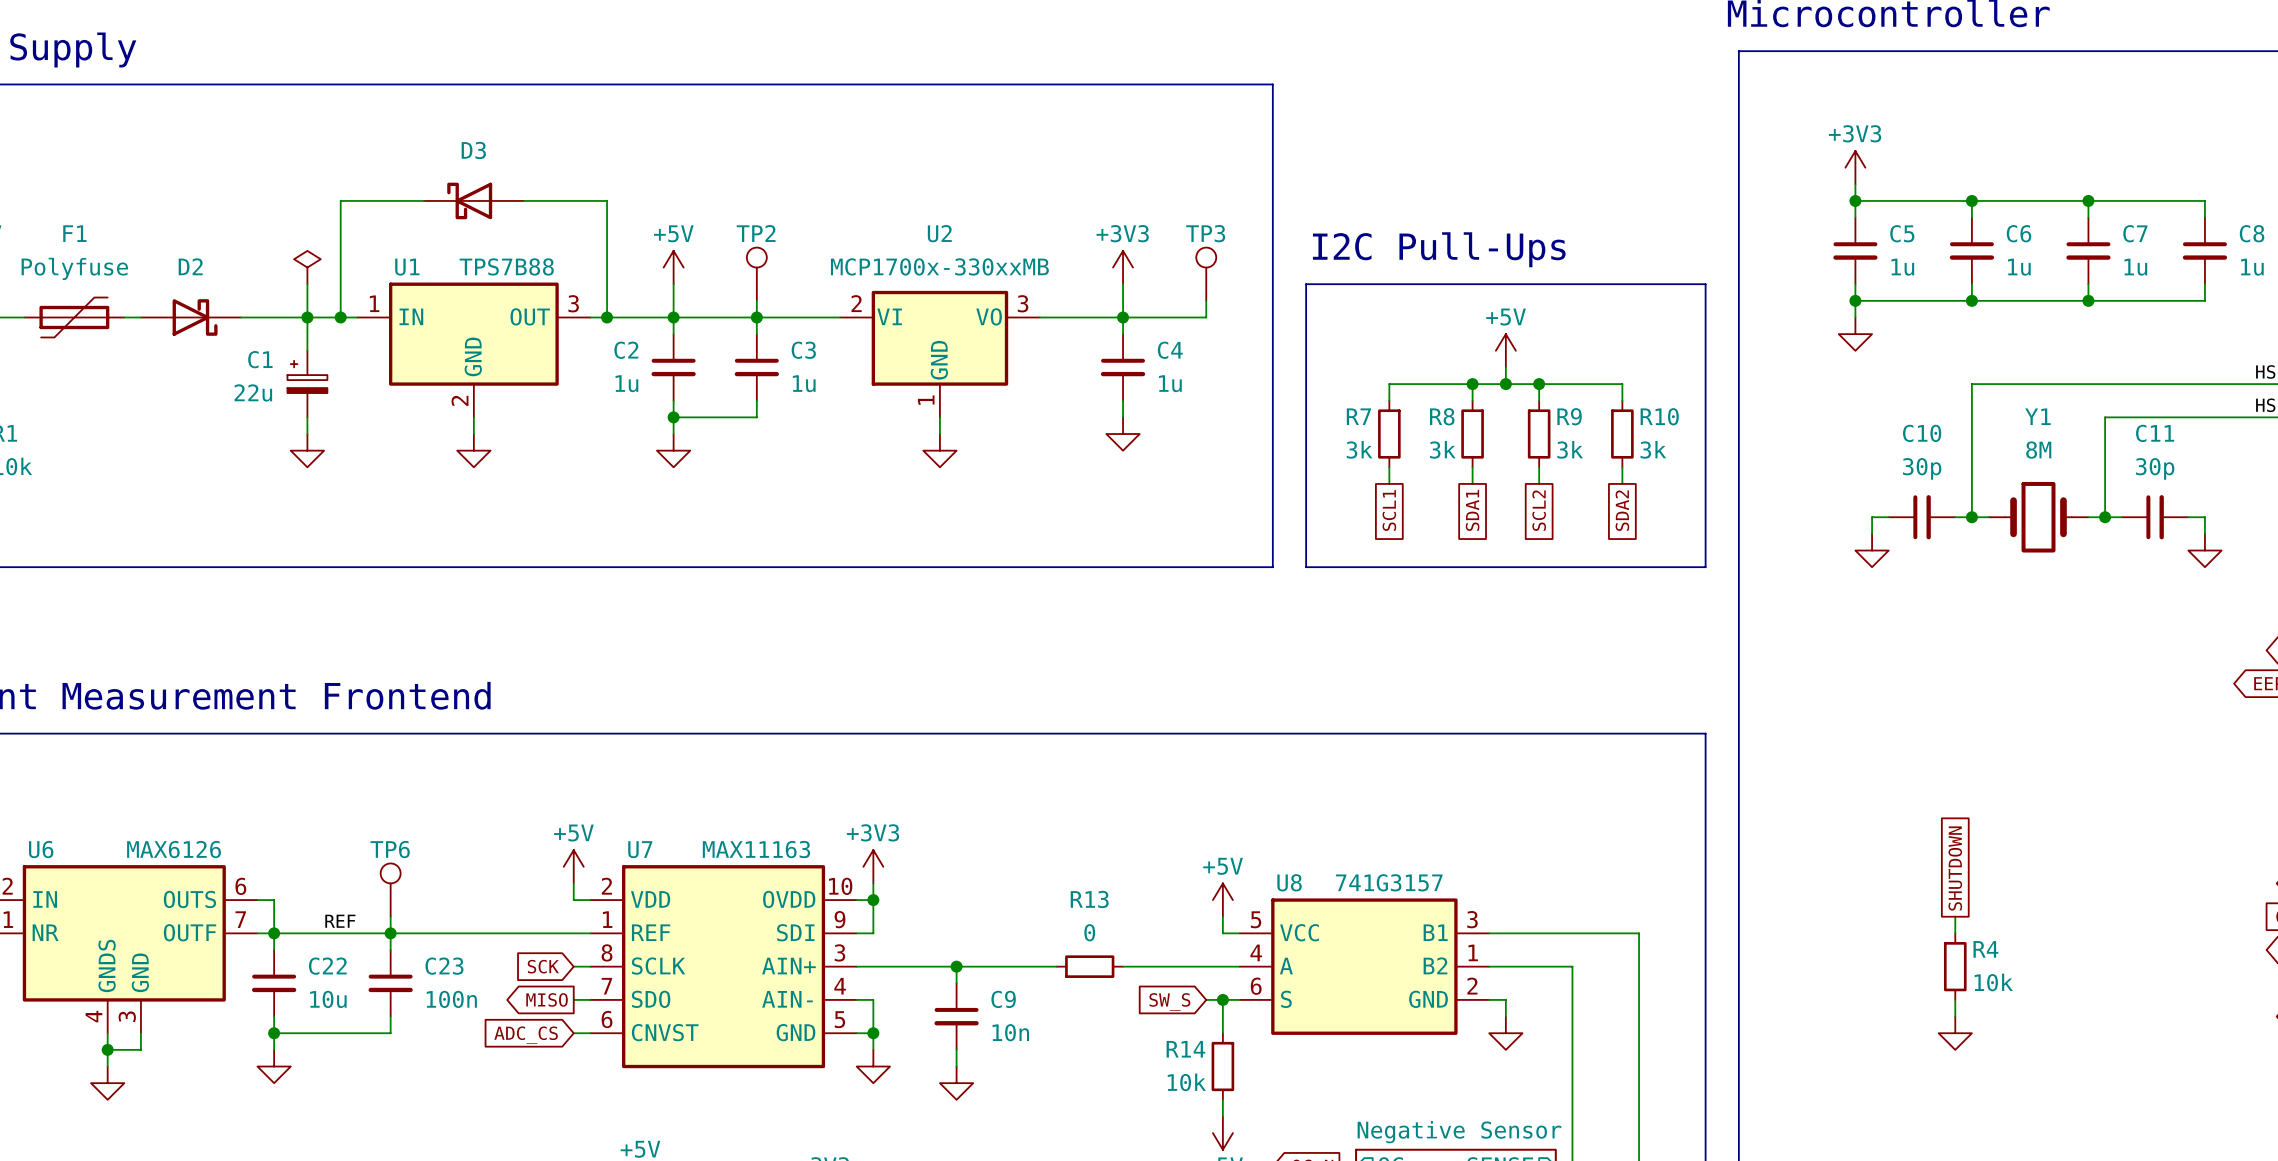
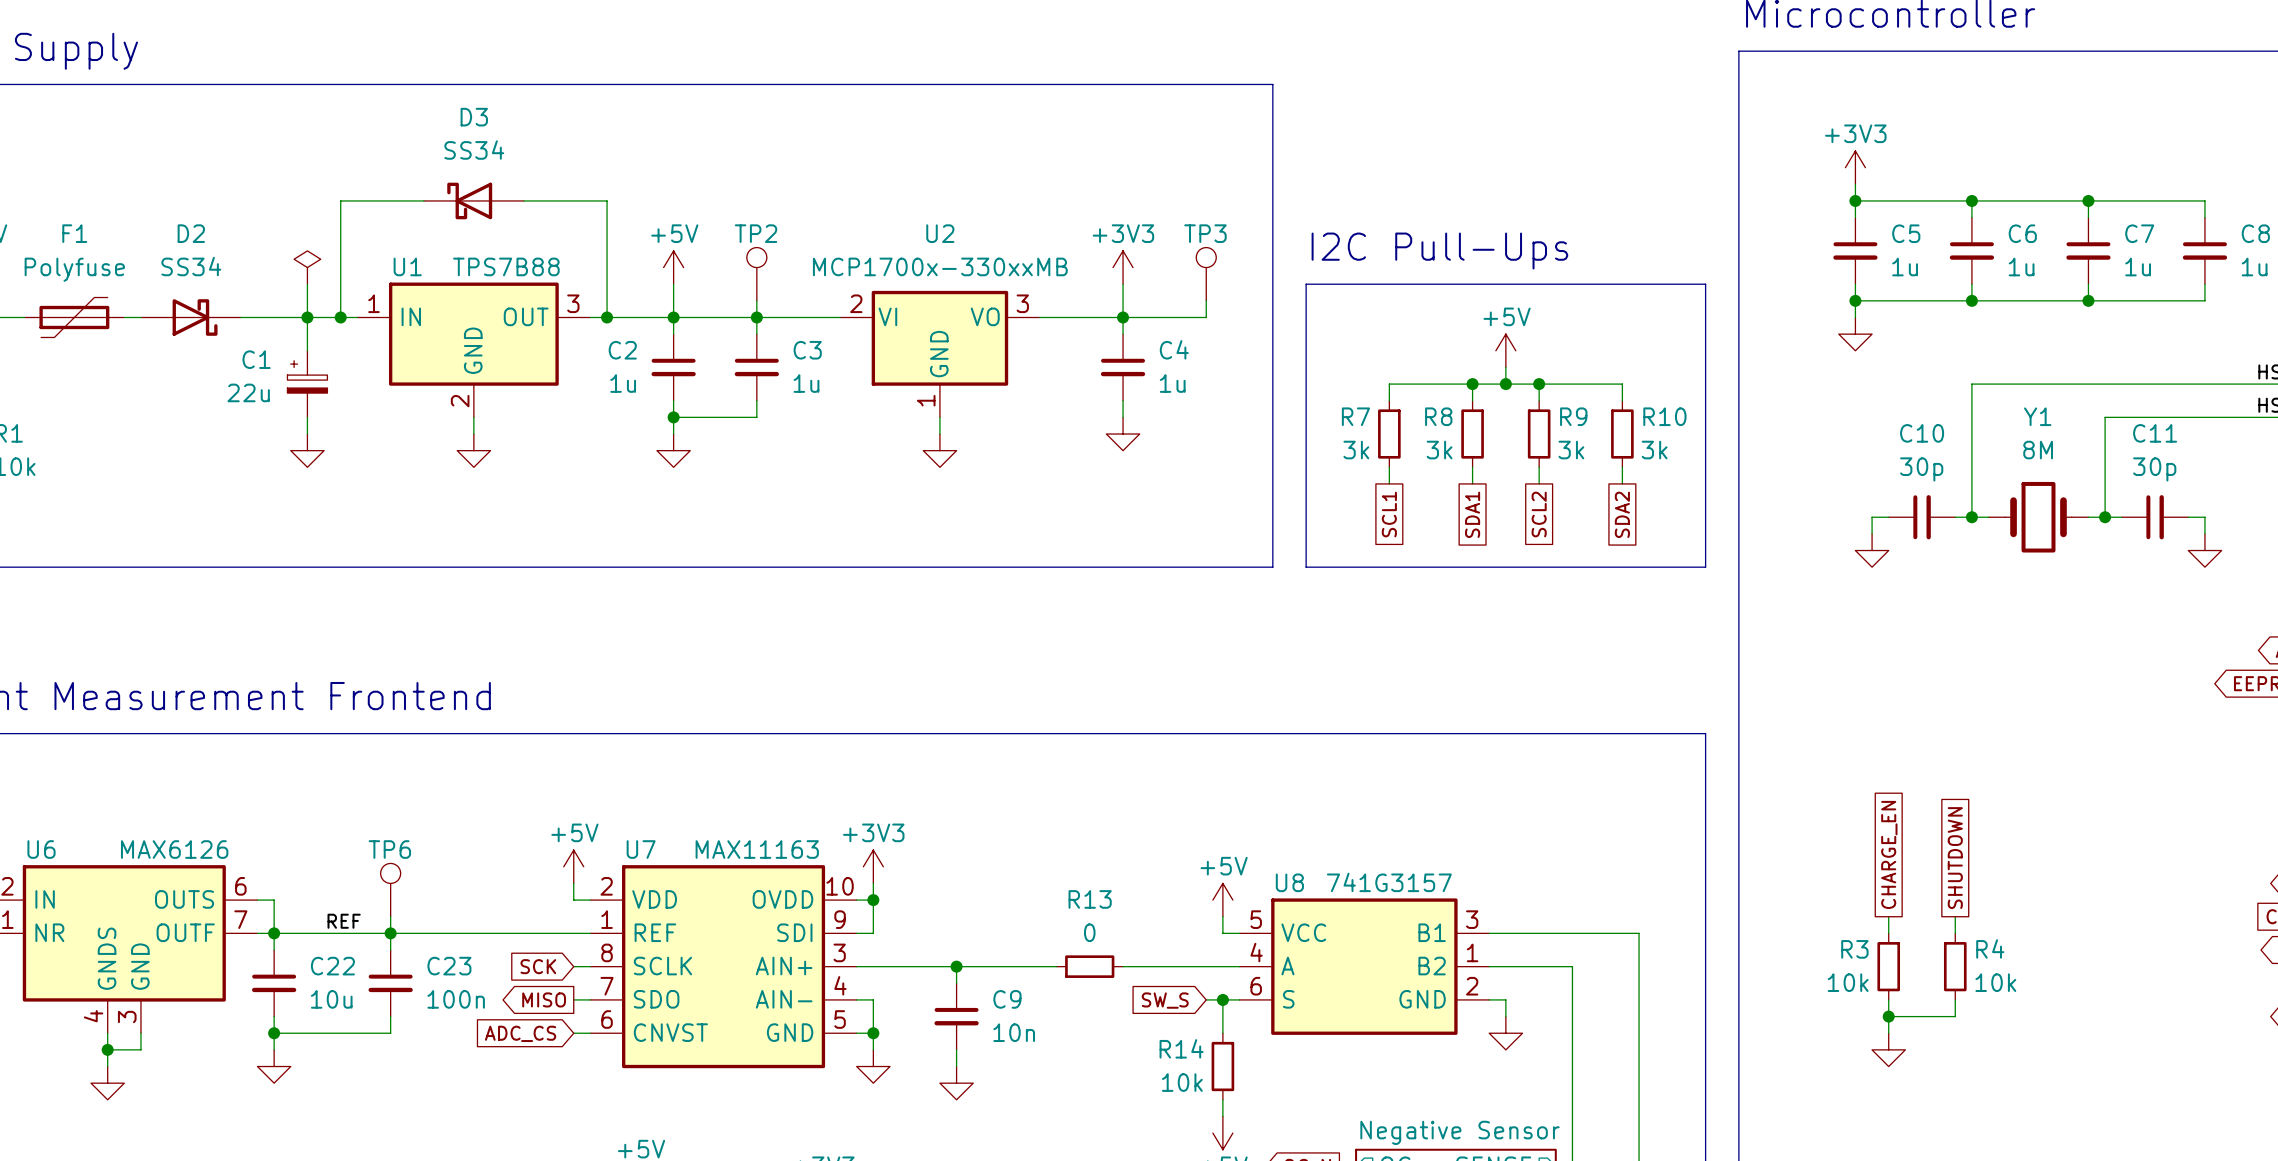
D3 name position: D3 (473, 150) -> D3 (474, 117)
D3 value: none -> SS34 (474, 150)
D2 name position: D2 (190, 266) -> D2 (191, 233)
D2 value: none -> SS34 (191, 266)
global label: none -> CHARGE_EN (1889, 854)
wire: none -> (1888, 916) (1888, 933)
R3: none -> 10k (1888, 966)
wire: none -> (1888, 999) (1888, 1033)
wire: none -> (1888, 1016) (1955, 1016)
junction: none -> (1888, 1016)
power symbol position: (1955, 1033) -> (1888, 1049)

